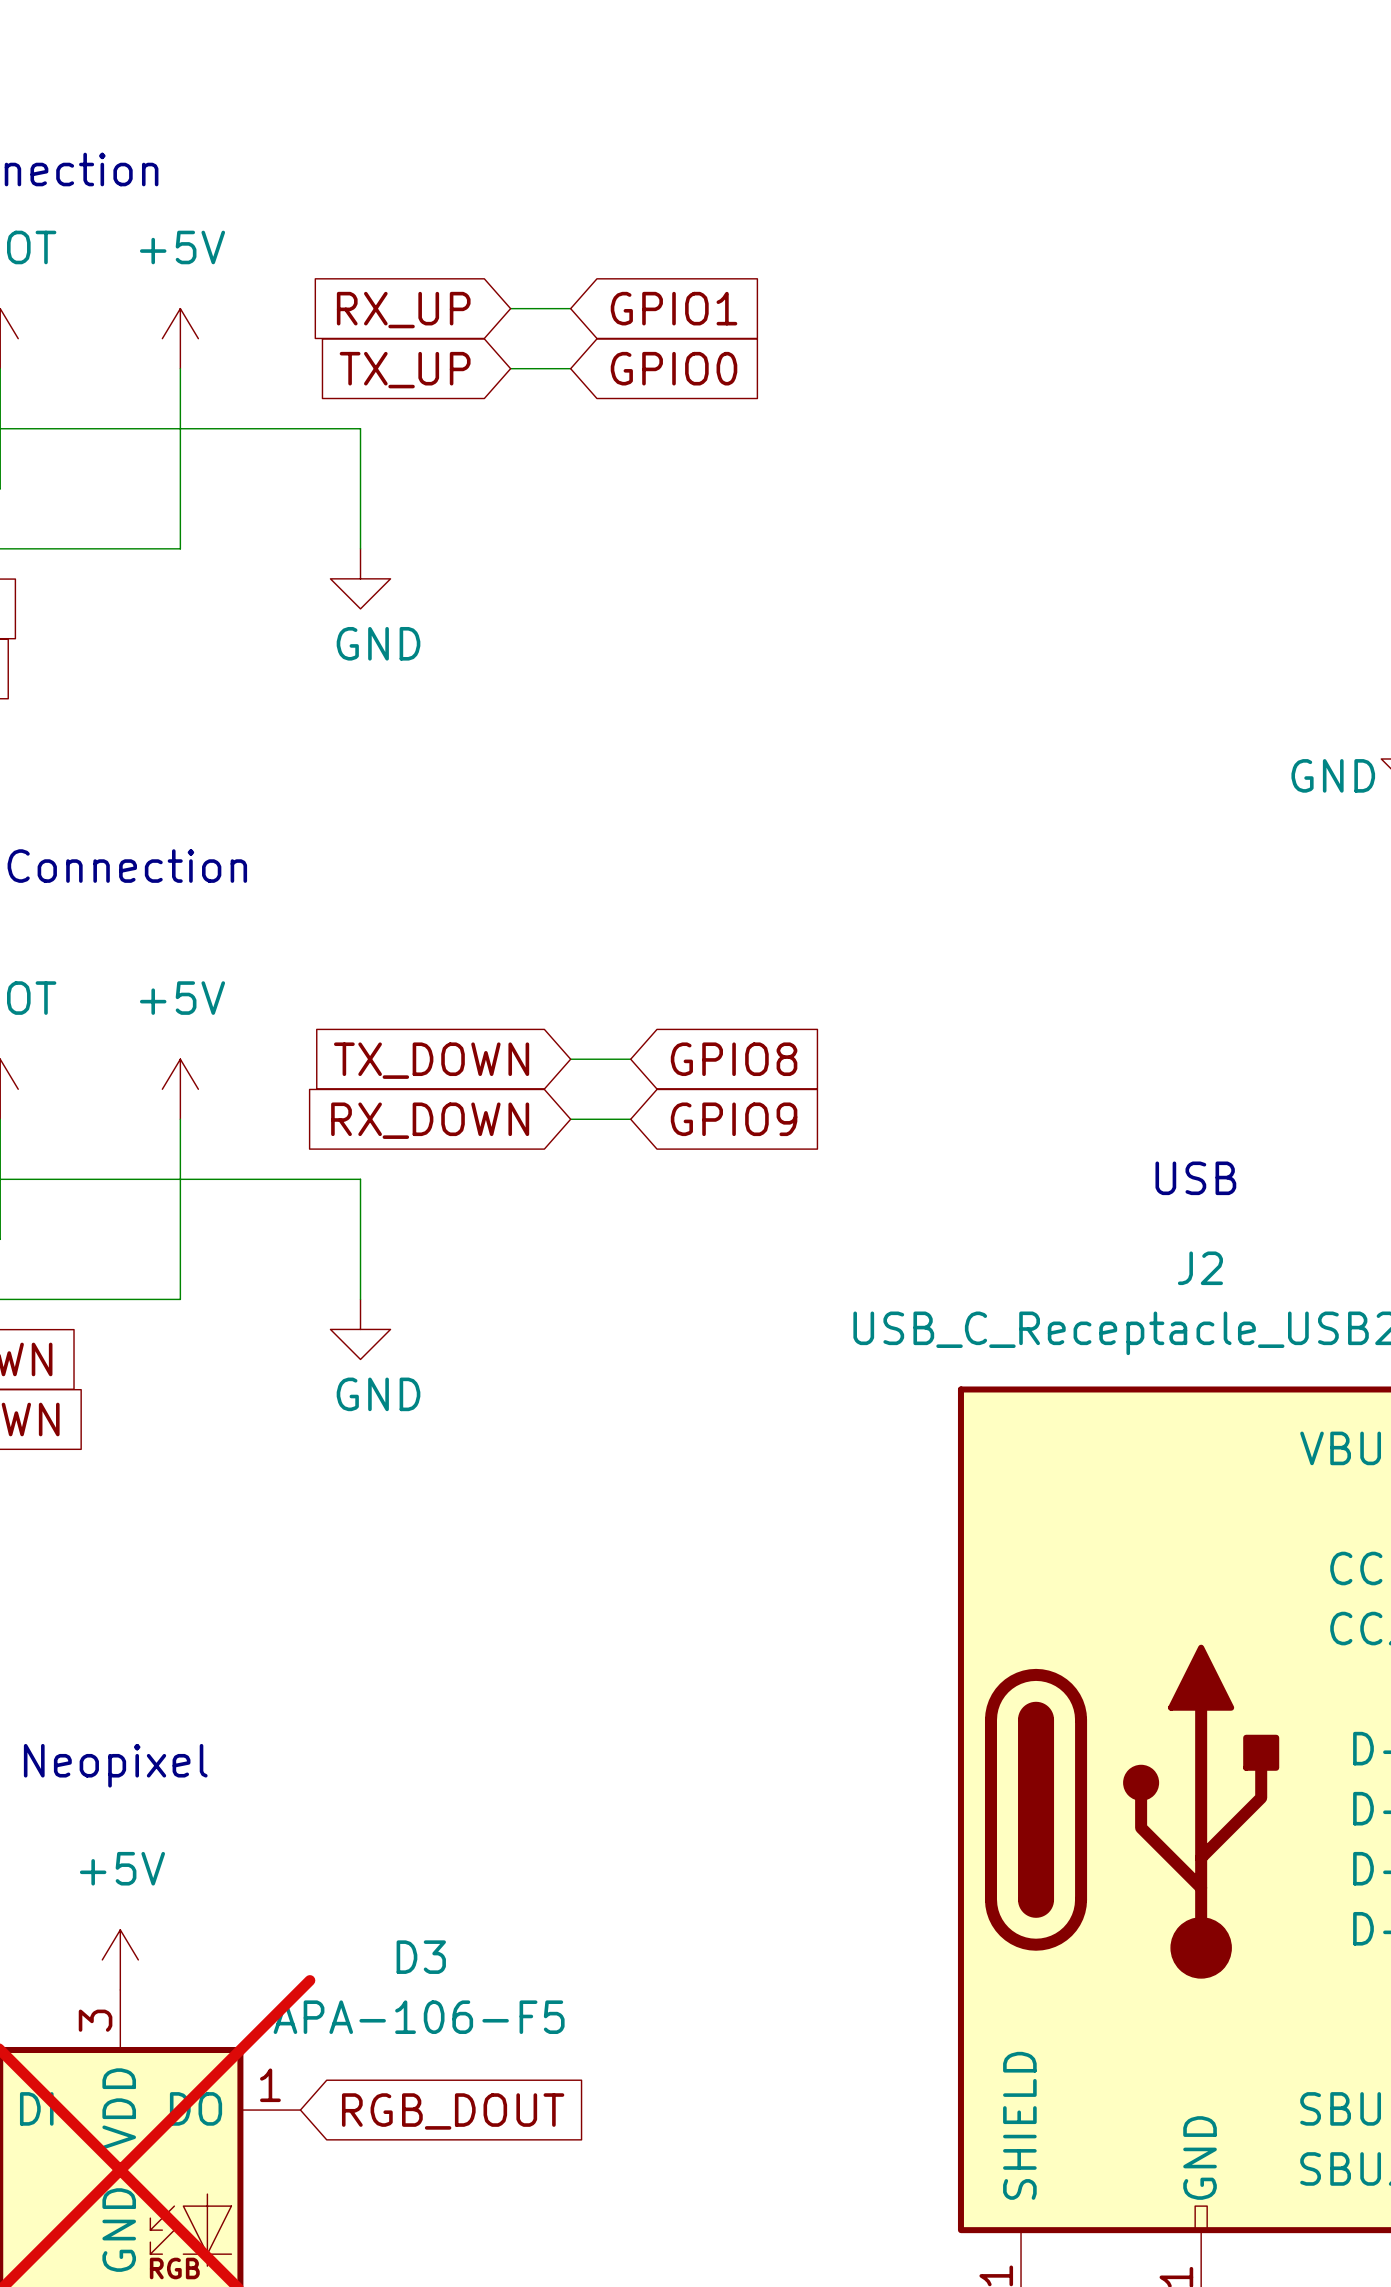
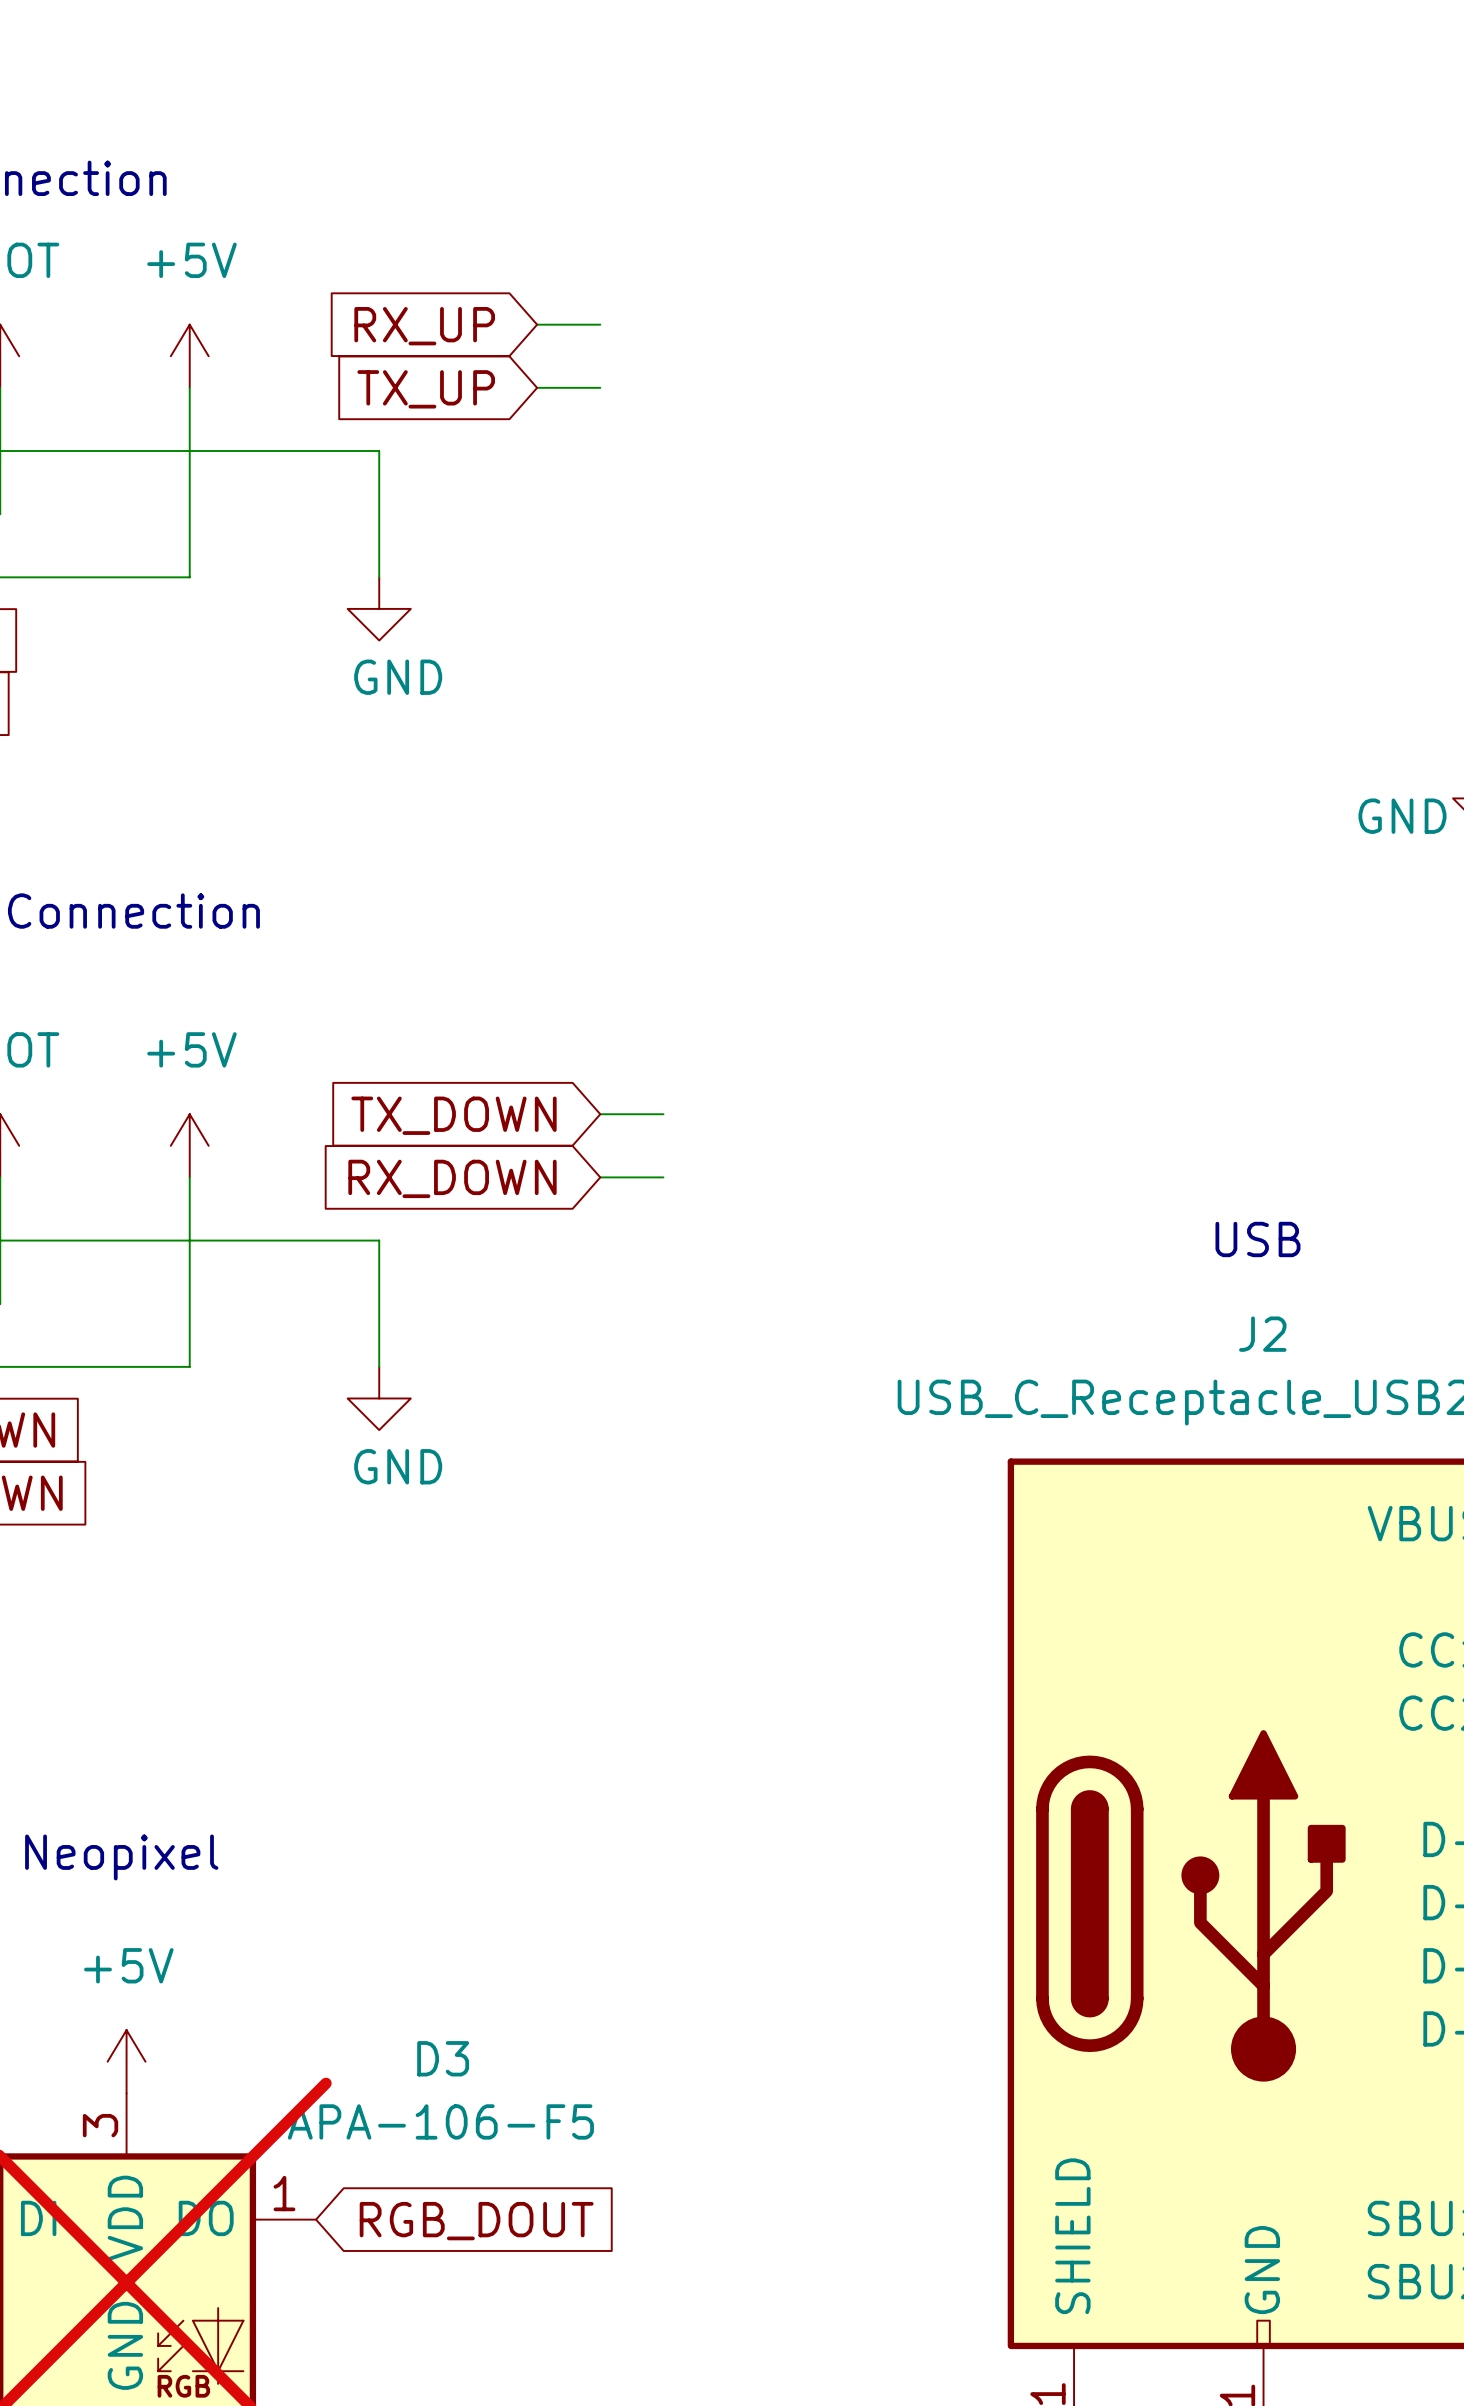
global label: GPIO1 (674, 308) -> none
global label: GPIO0 (674, 368) -> none
global label: GPIO8 (734, 1059) -> none
global label: GPIO9 (734, 1119) -> none

